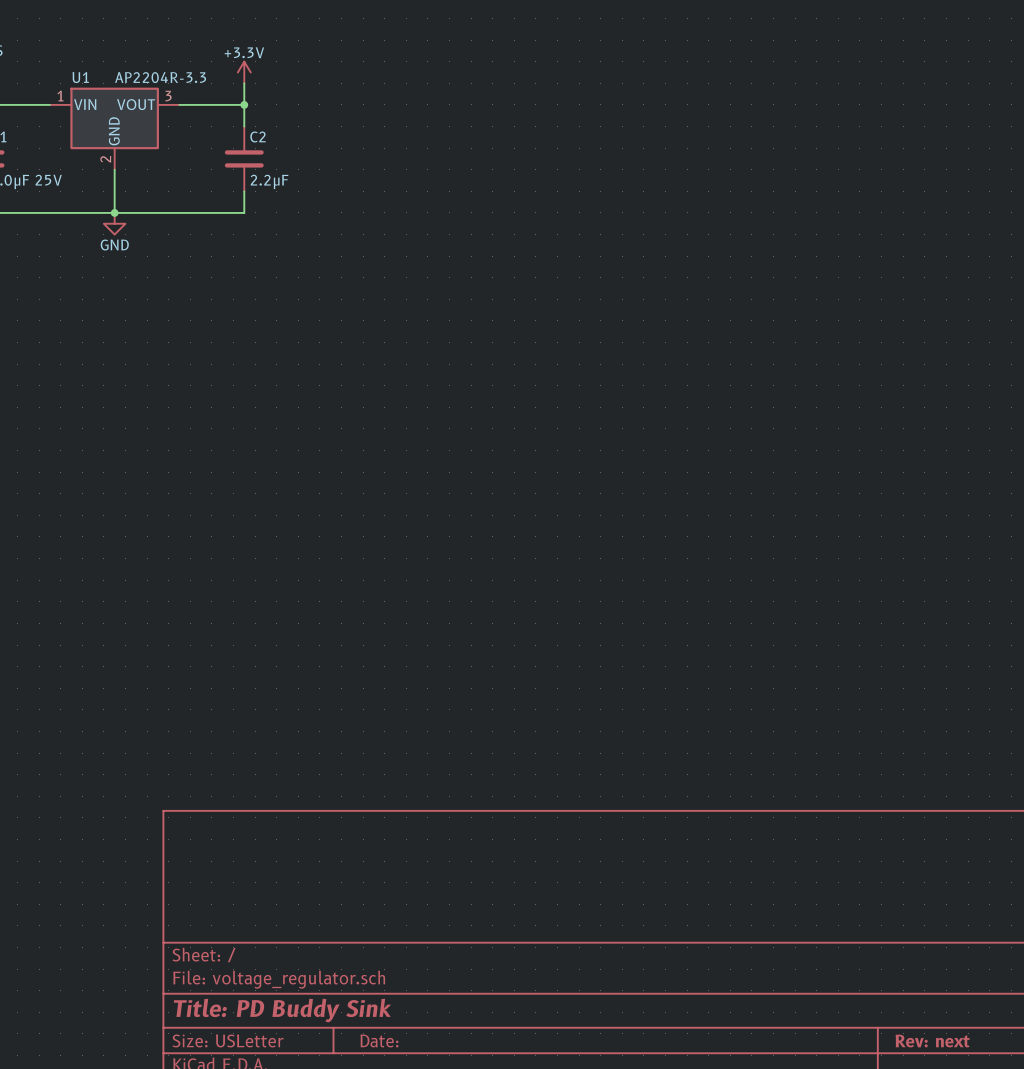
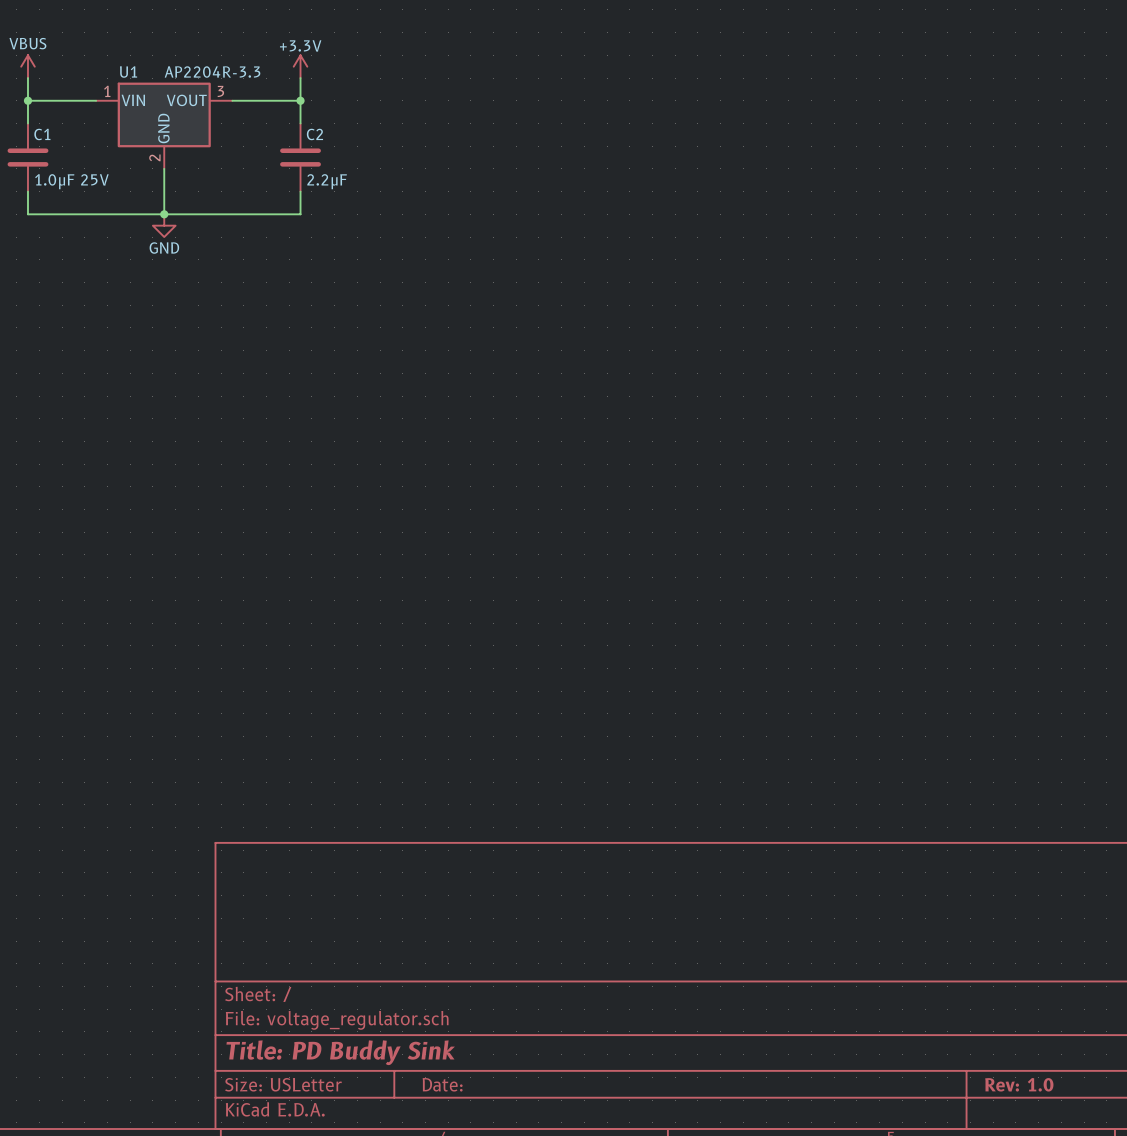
title block: Rev: next (932, 1041) -> Rev: 1.0 (1019, 1084)

